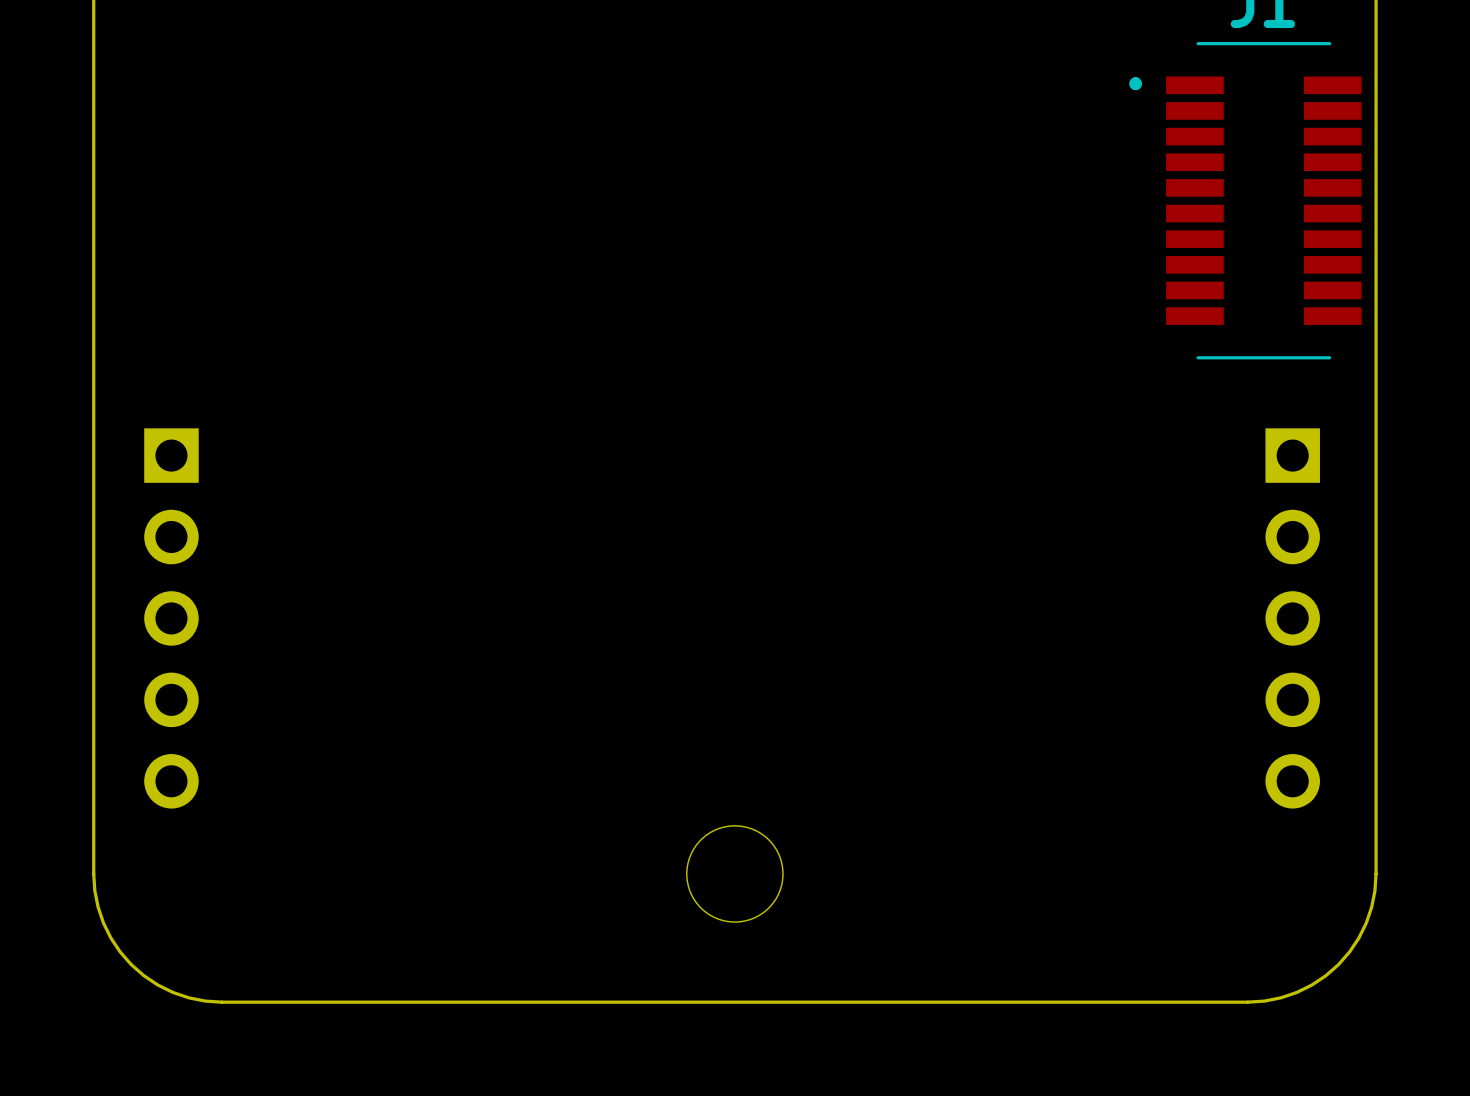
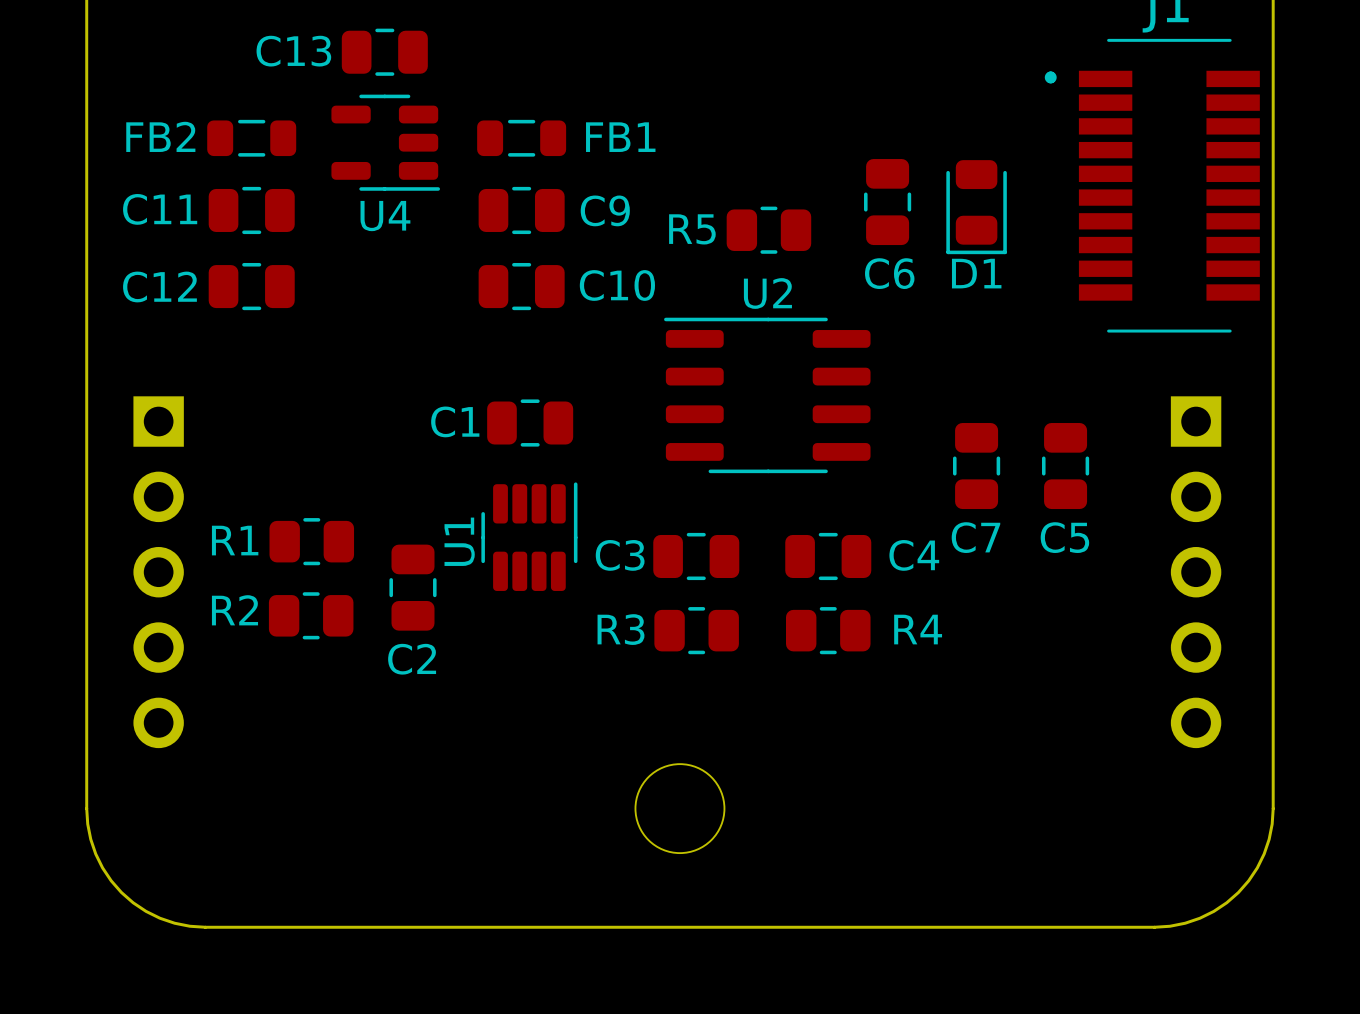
C13: none -> (384, 52)
FB2: none -> (251, 138)
FB1: none -> (521, 138)
U4: none -> (385, 142)
C6: none -> (887, 202)
D1: none -> (976, 207)
C11: none -> (251, 210)
C9: none -> (521, 210)
R5: none -> (768, 230)
C12: none -> (251, 286)
C10: none -> (521, 286)
U2: none -> (767, 395)
C1: none -> (530, 423)
C7: none -> (976, 466)
C5: none -> (1065, 466)
U1: none -> (529, 536)
R1: none -> (311, 541)
C3: none -> (696, 556)
C4: none -> (828, 556)
C2: none -> (413, 587)
R2: none -> (311, 615)
R3: none -> (696, 630)
R4: none -> (828, 630)

